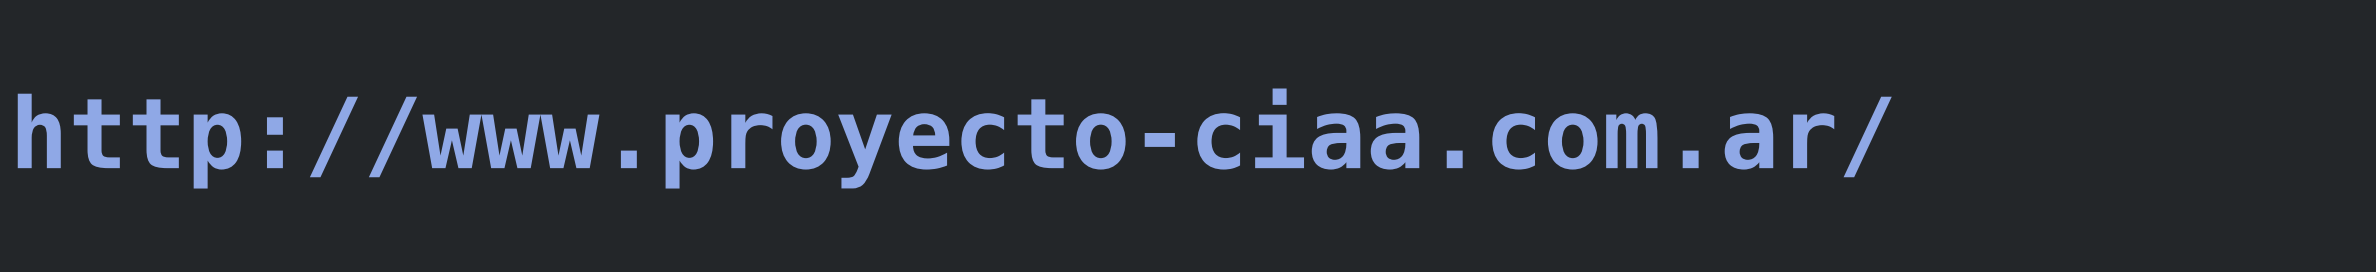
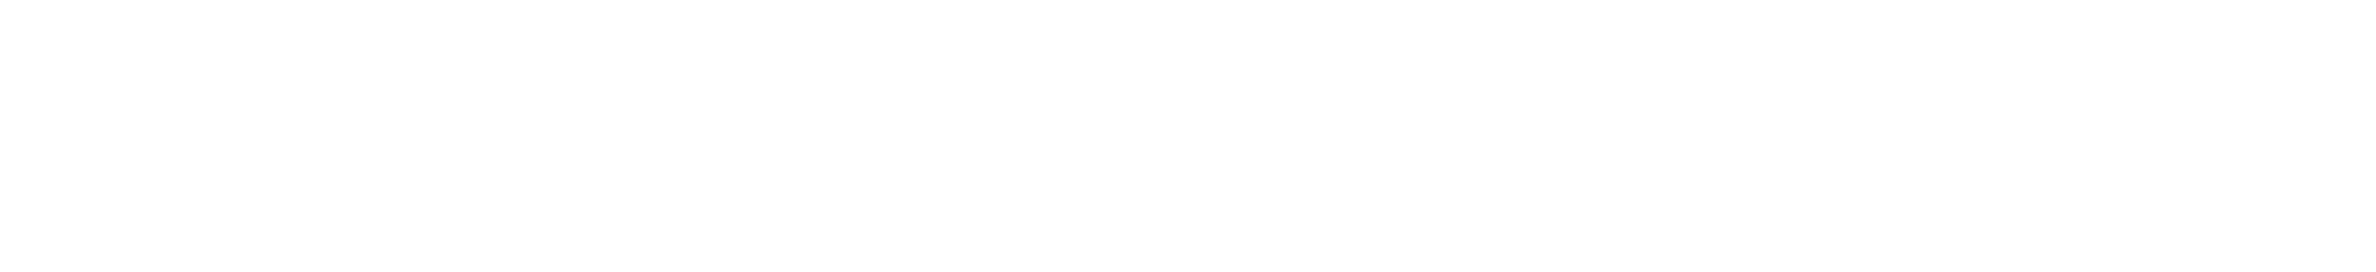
text: http://www.proyecto-ciaa.com.ar/ (954, 138) -> none

